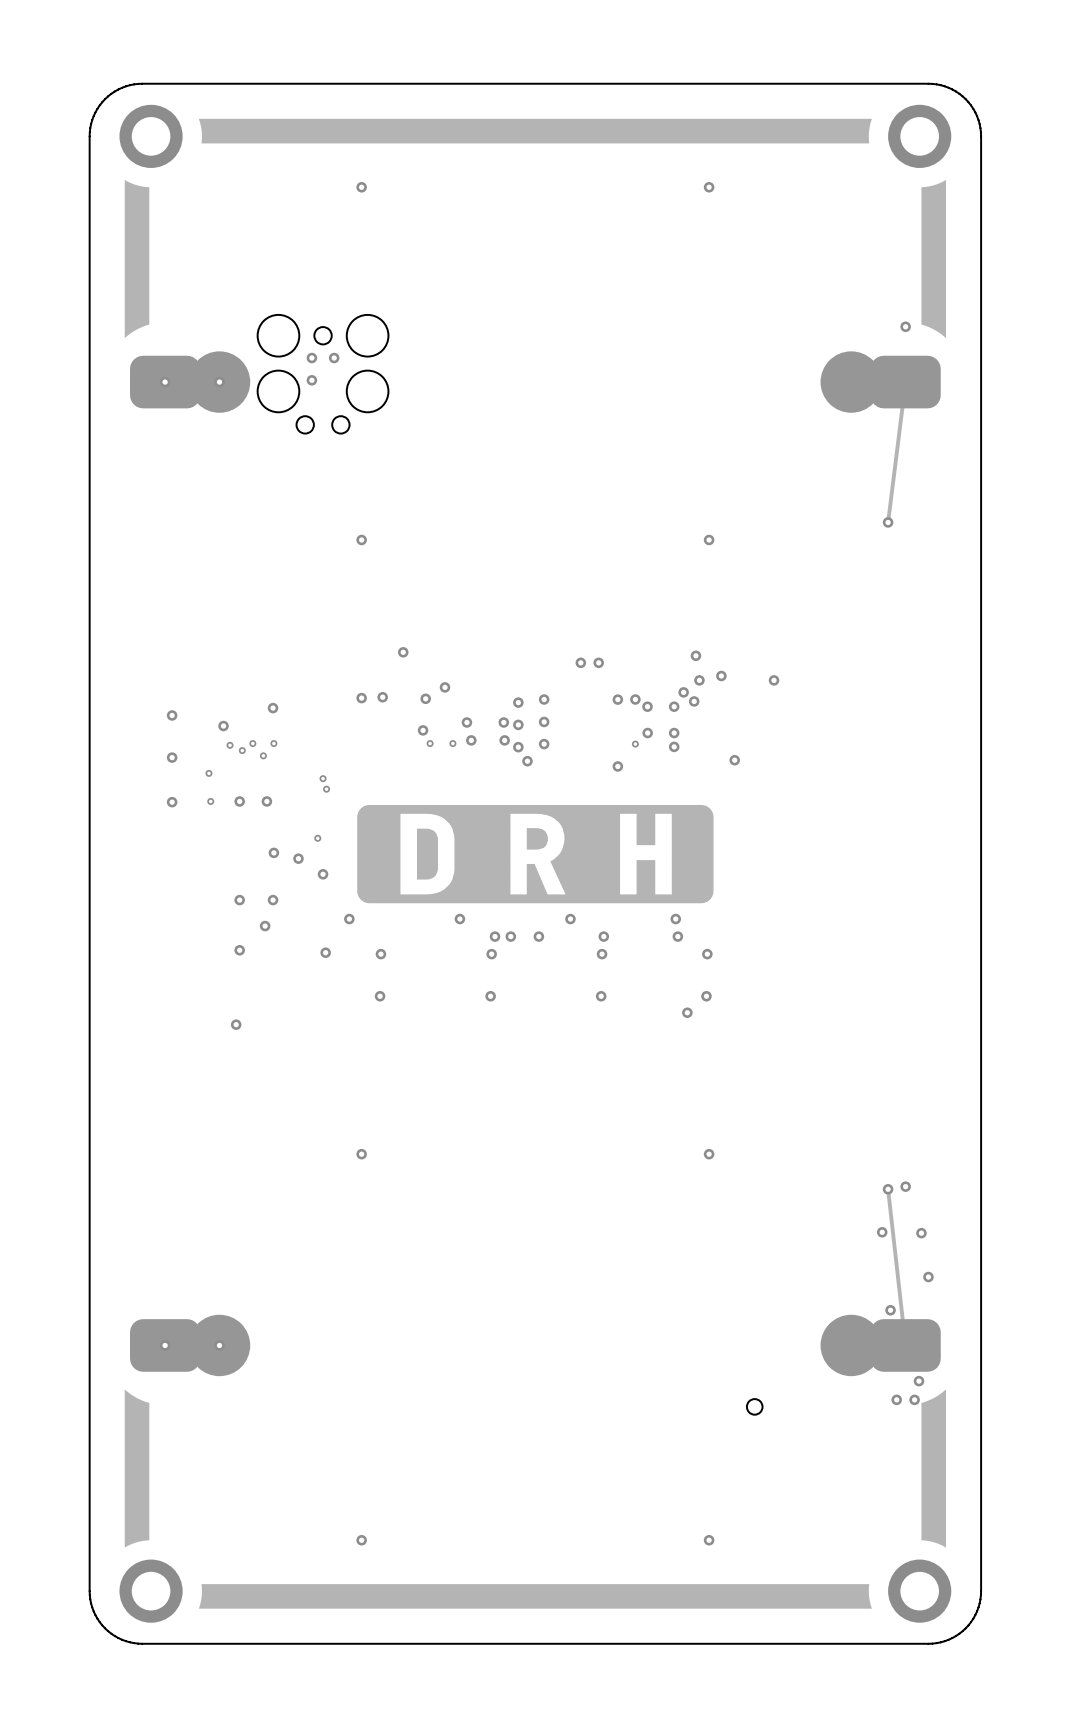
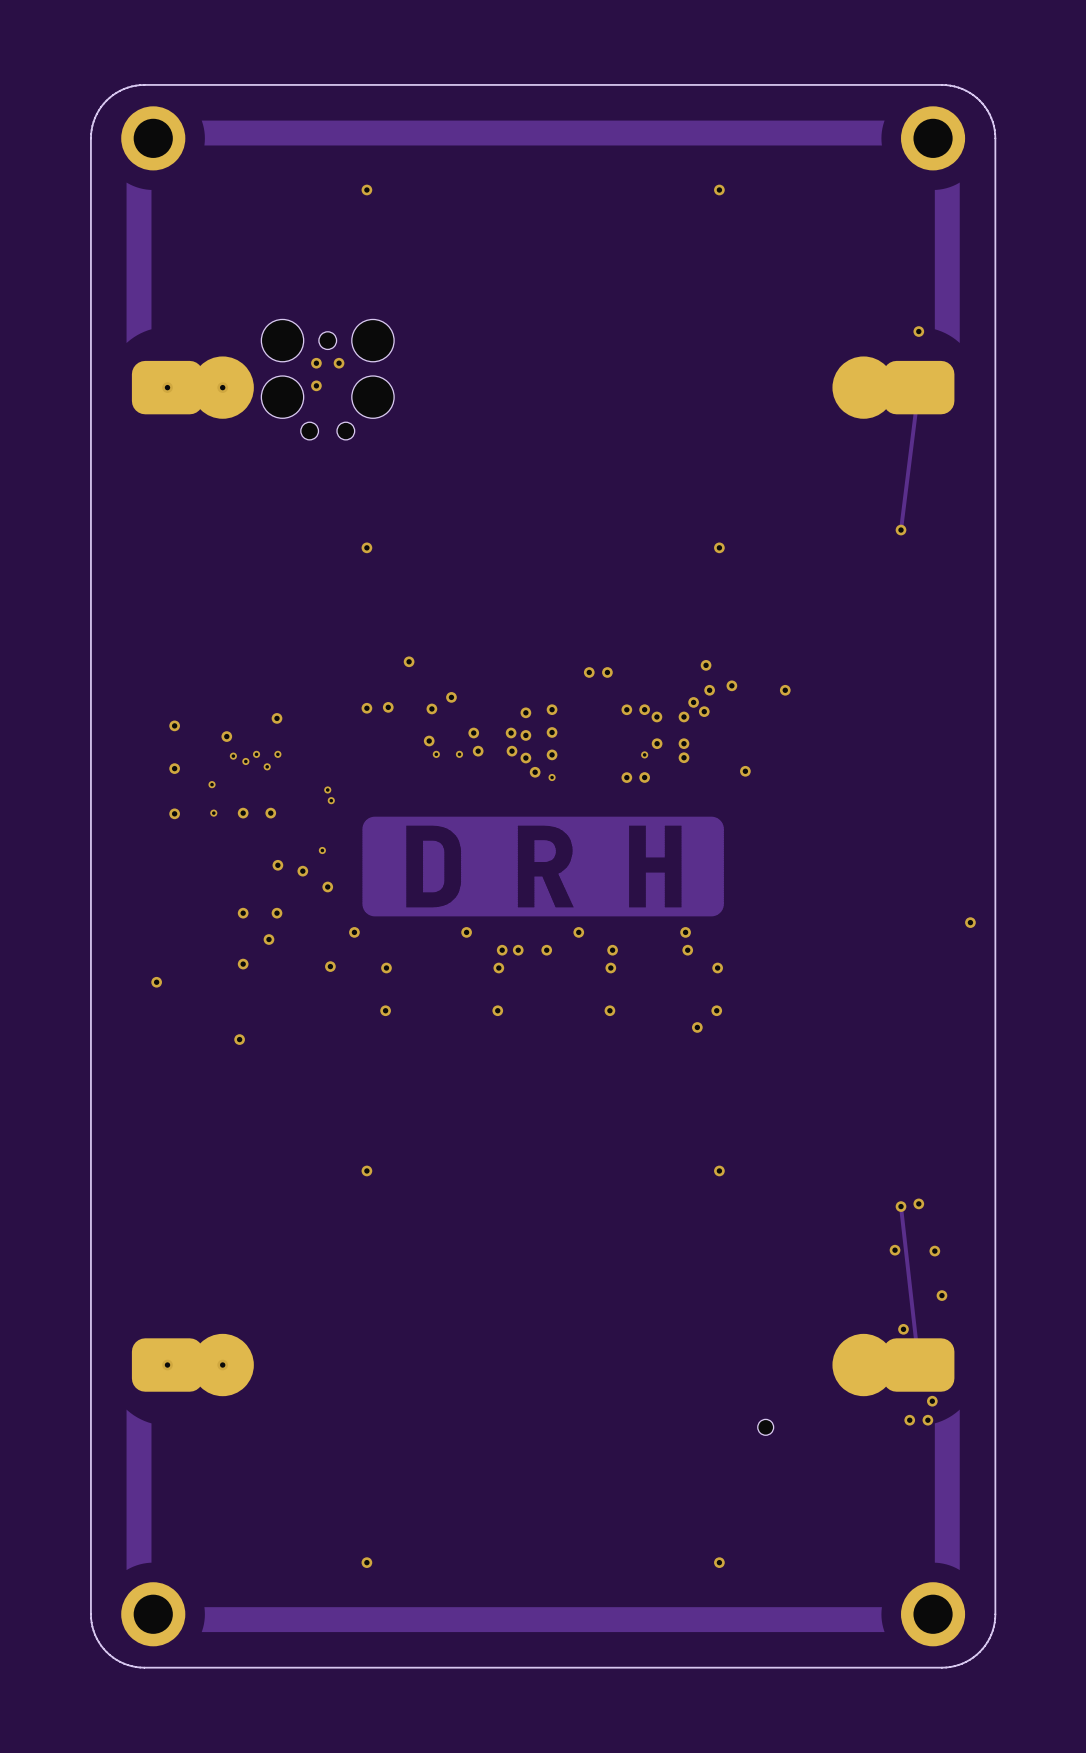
via: none -> (552, 777)
via: none -> (644, 777)
via: none -> (970, 922)
via: none -> (156, 982)

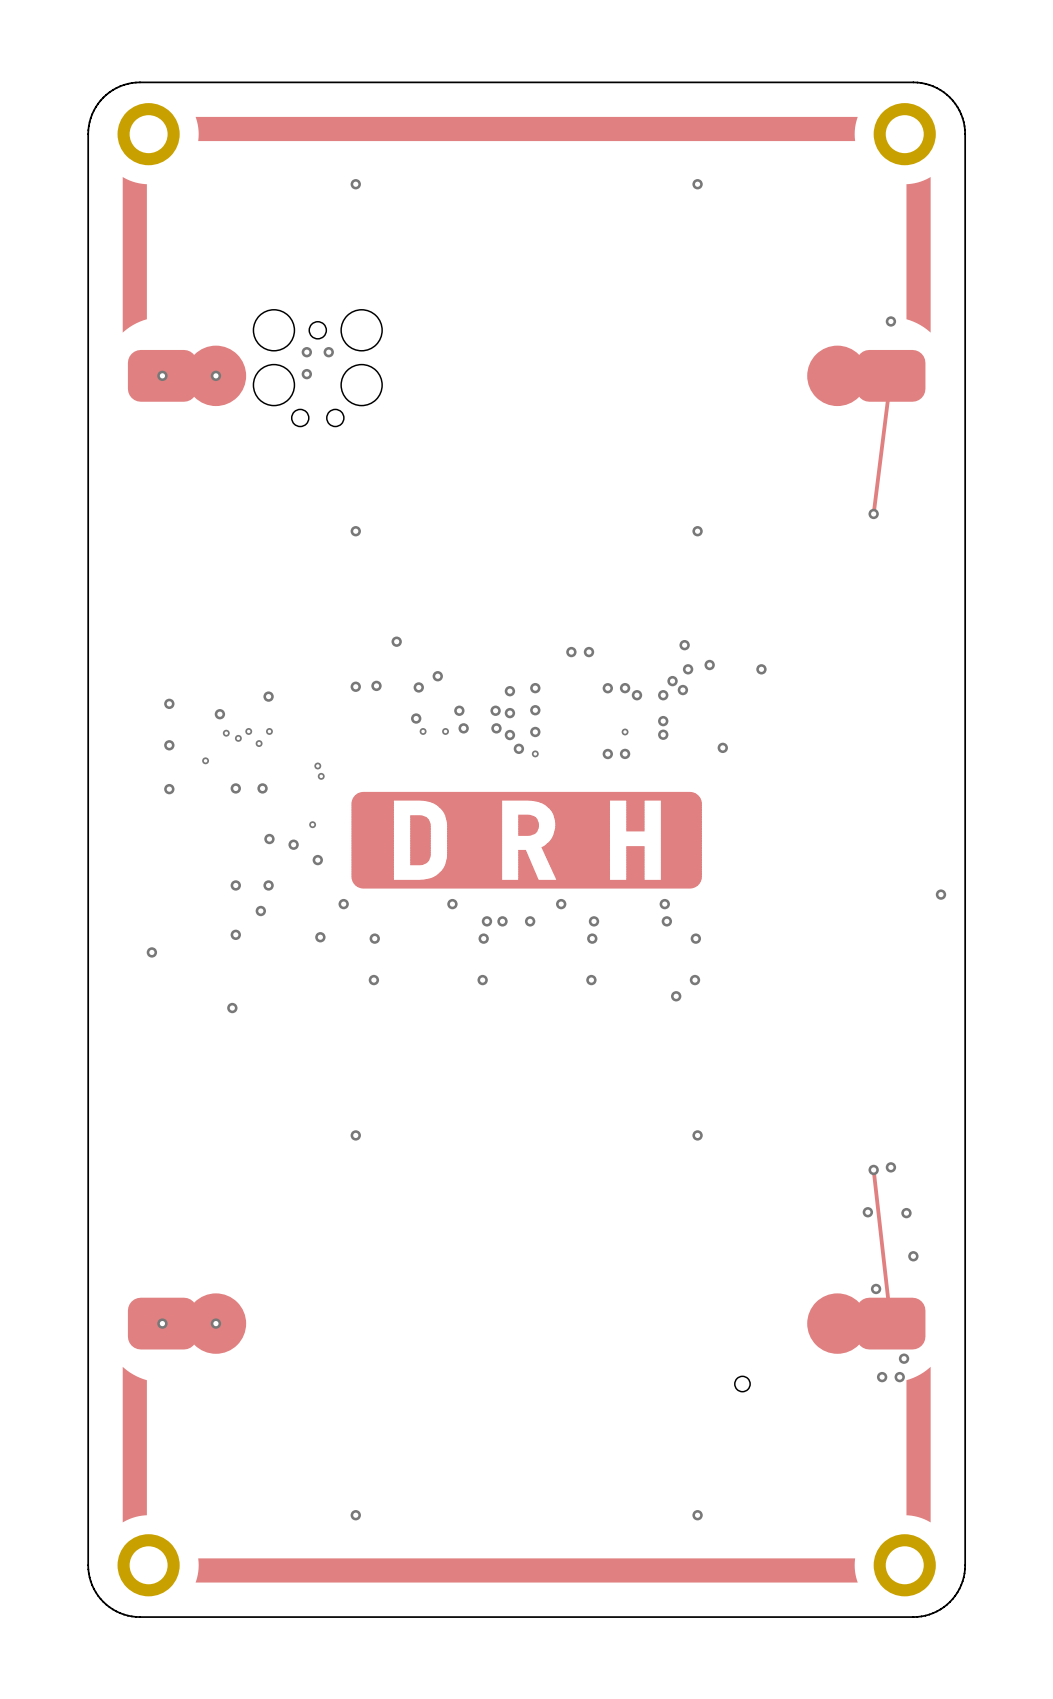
via: (657, 743) -> none
via: (213, 813) -> none

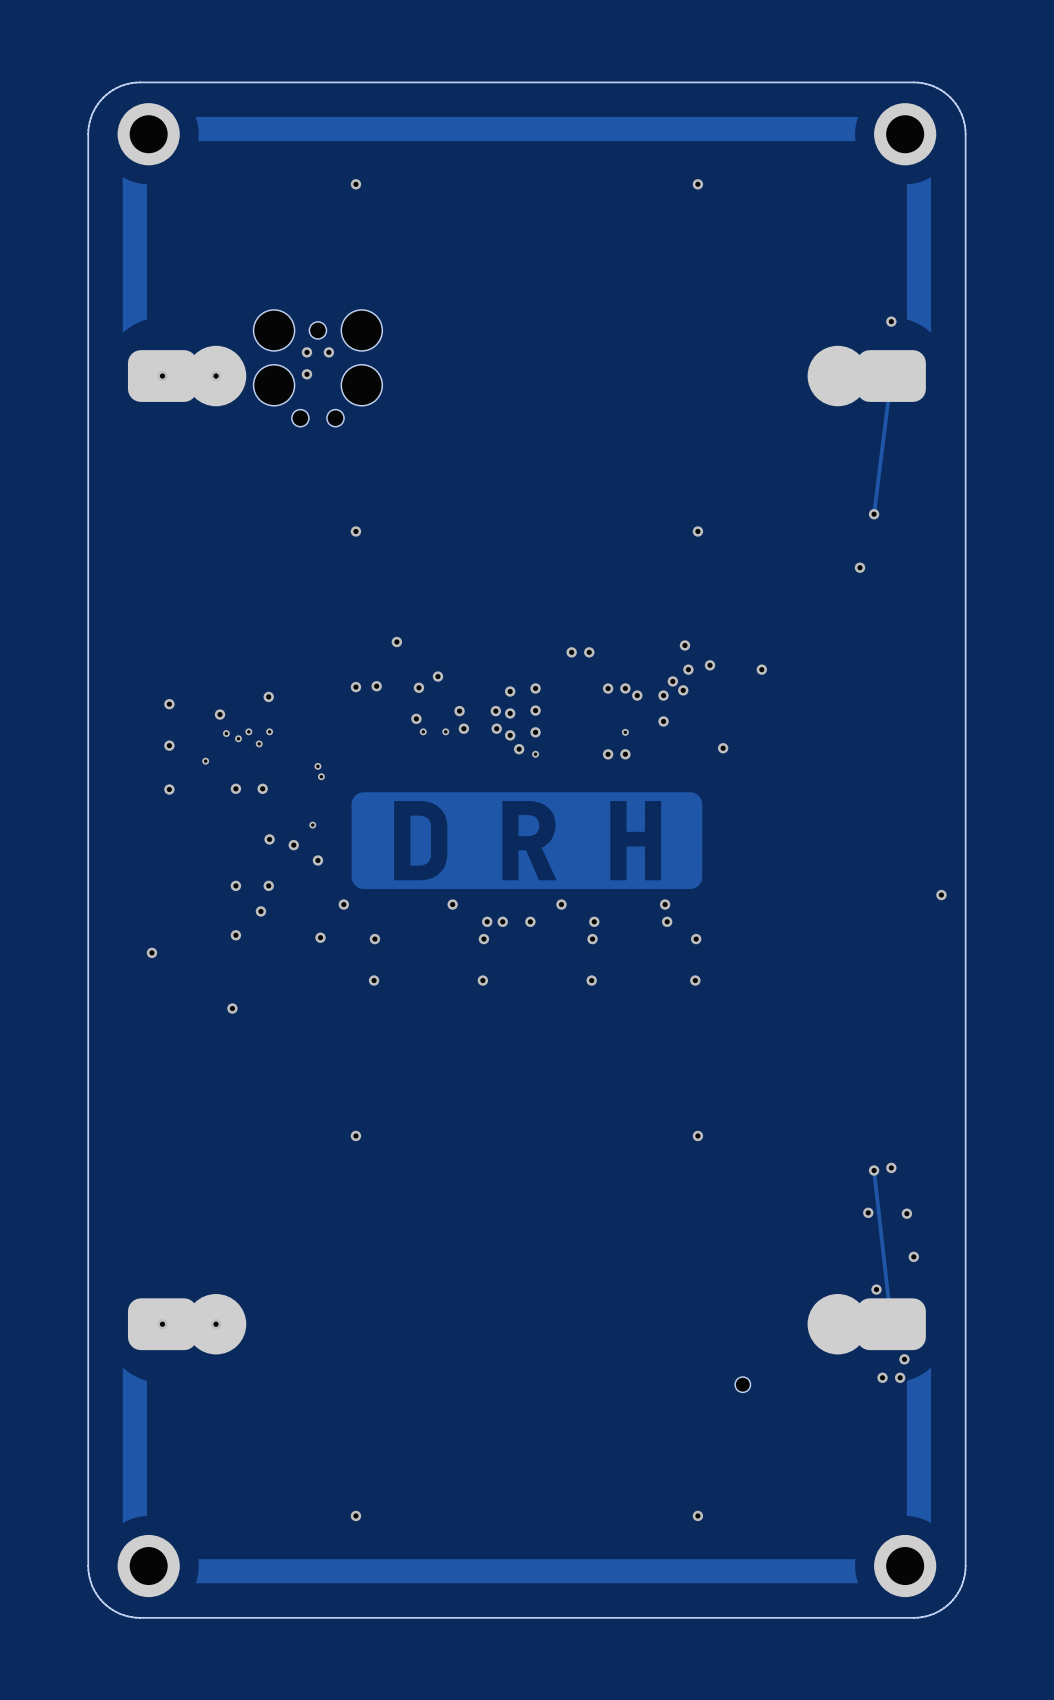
via: none -> (860, 567)
via: (663, 734) -> none
via: (676, 996) -> none

